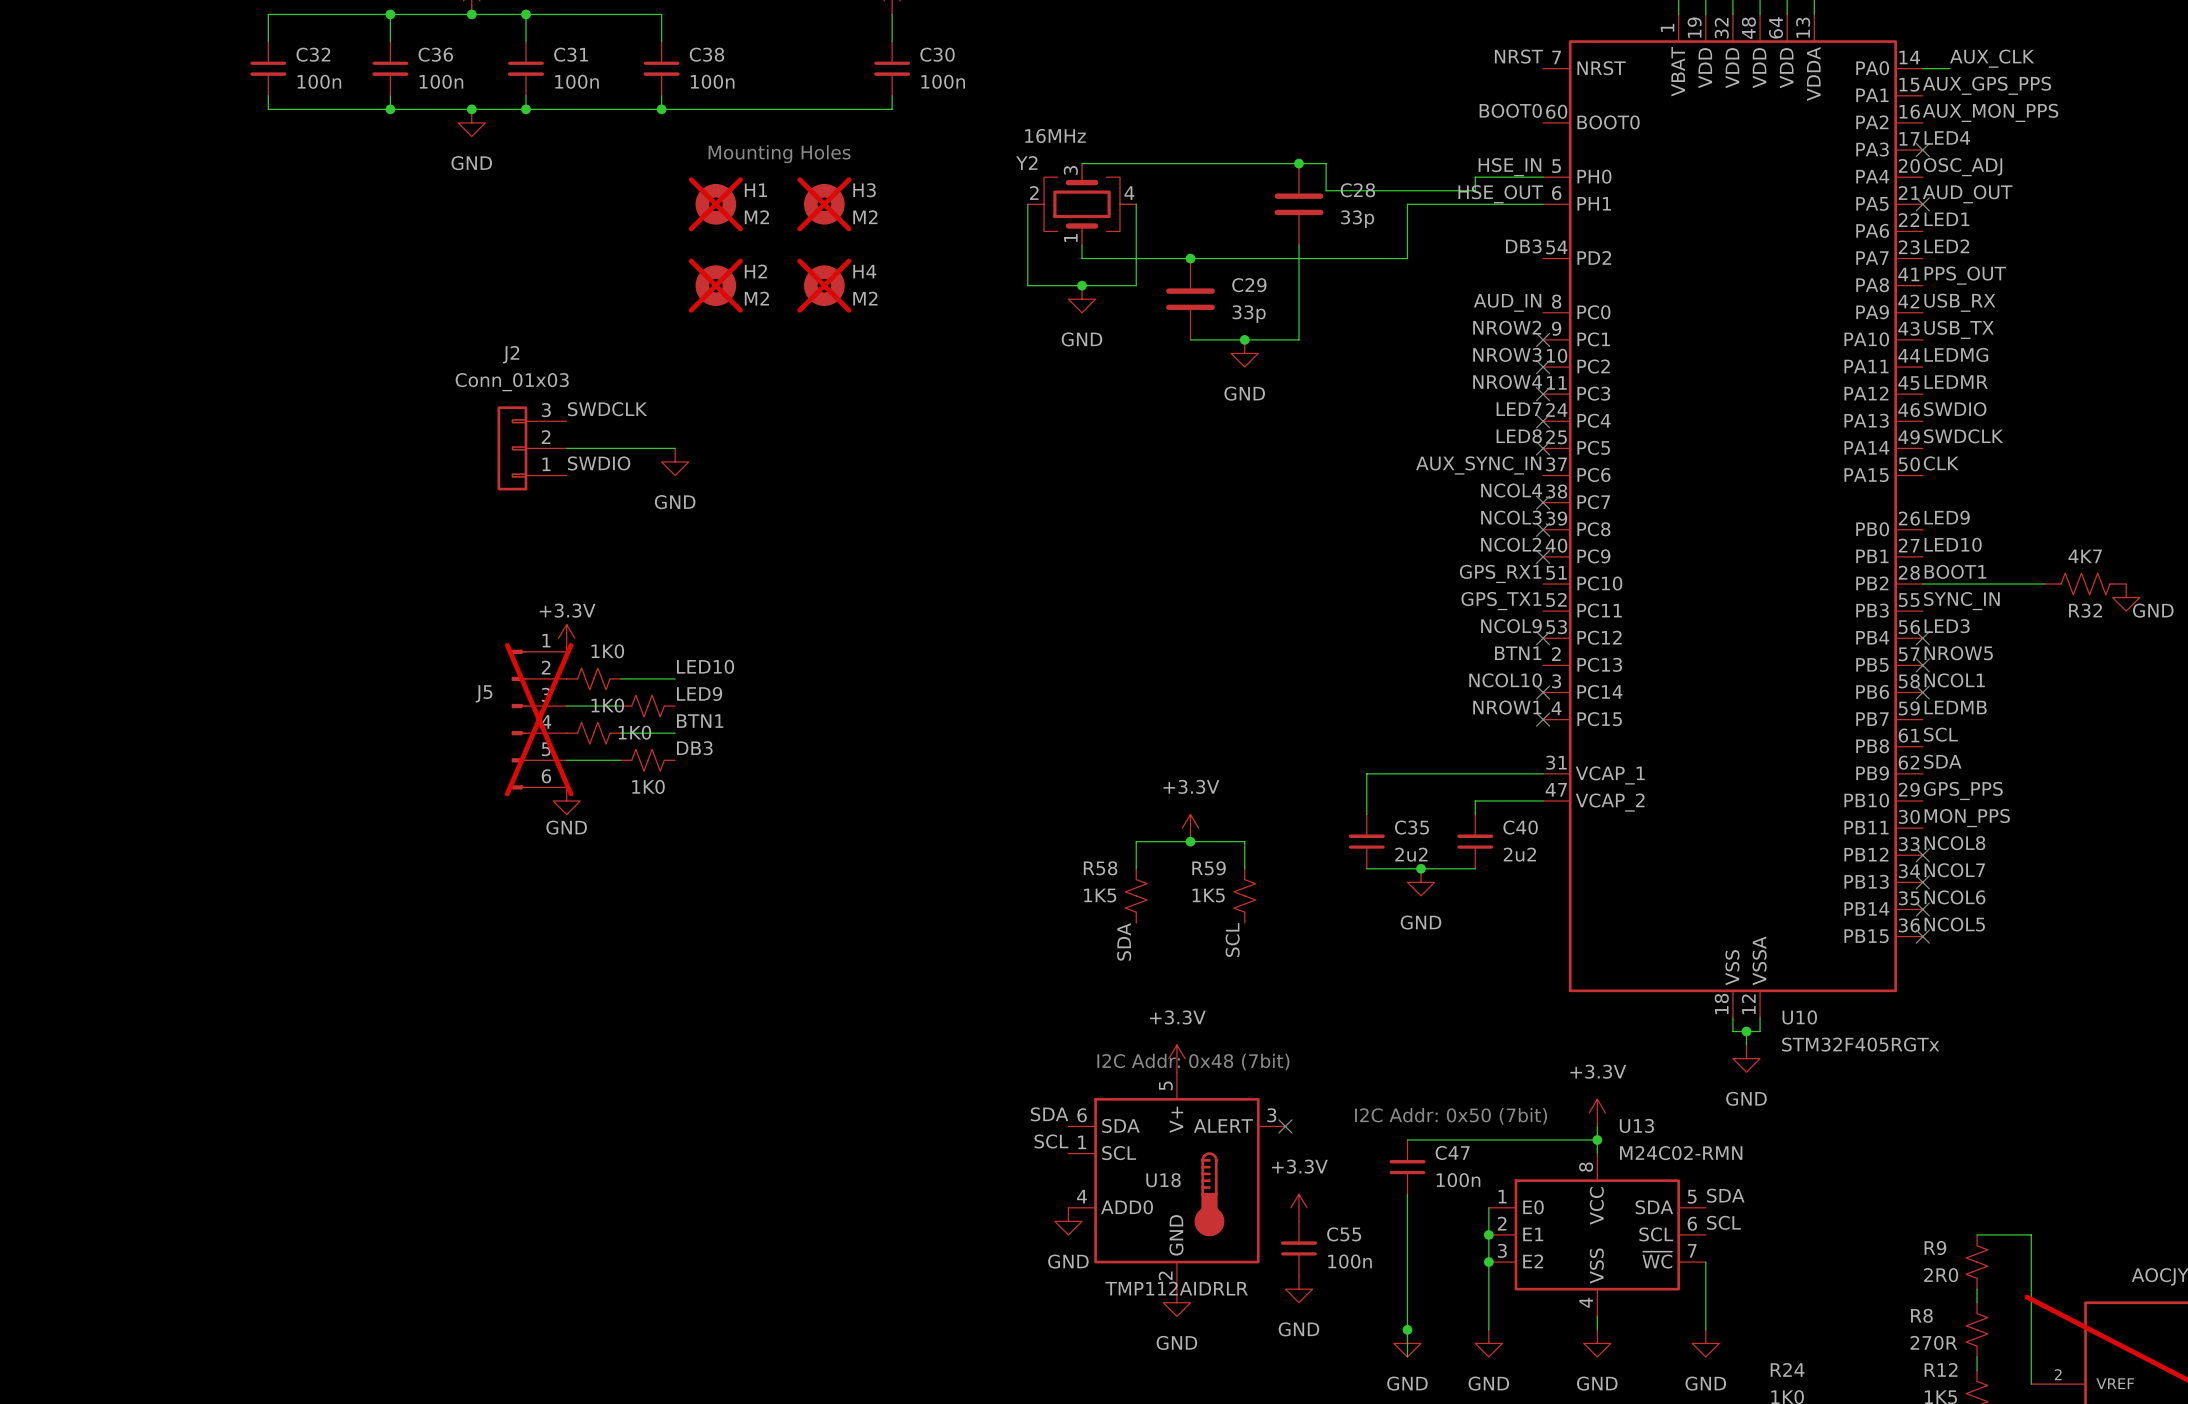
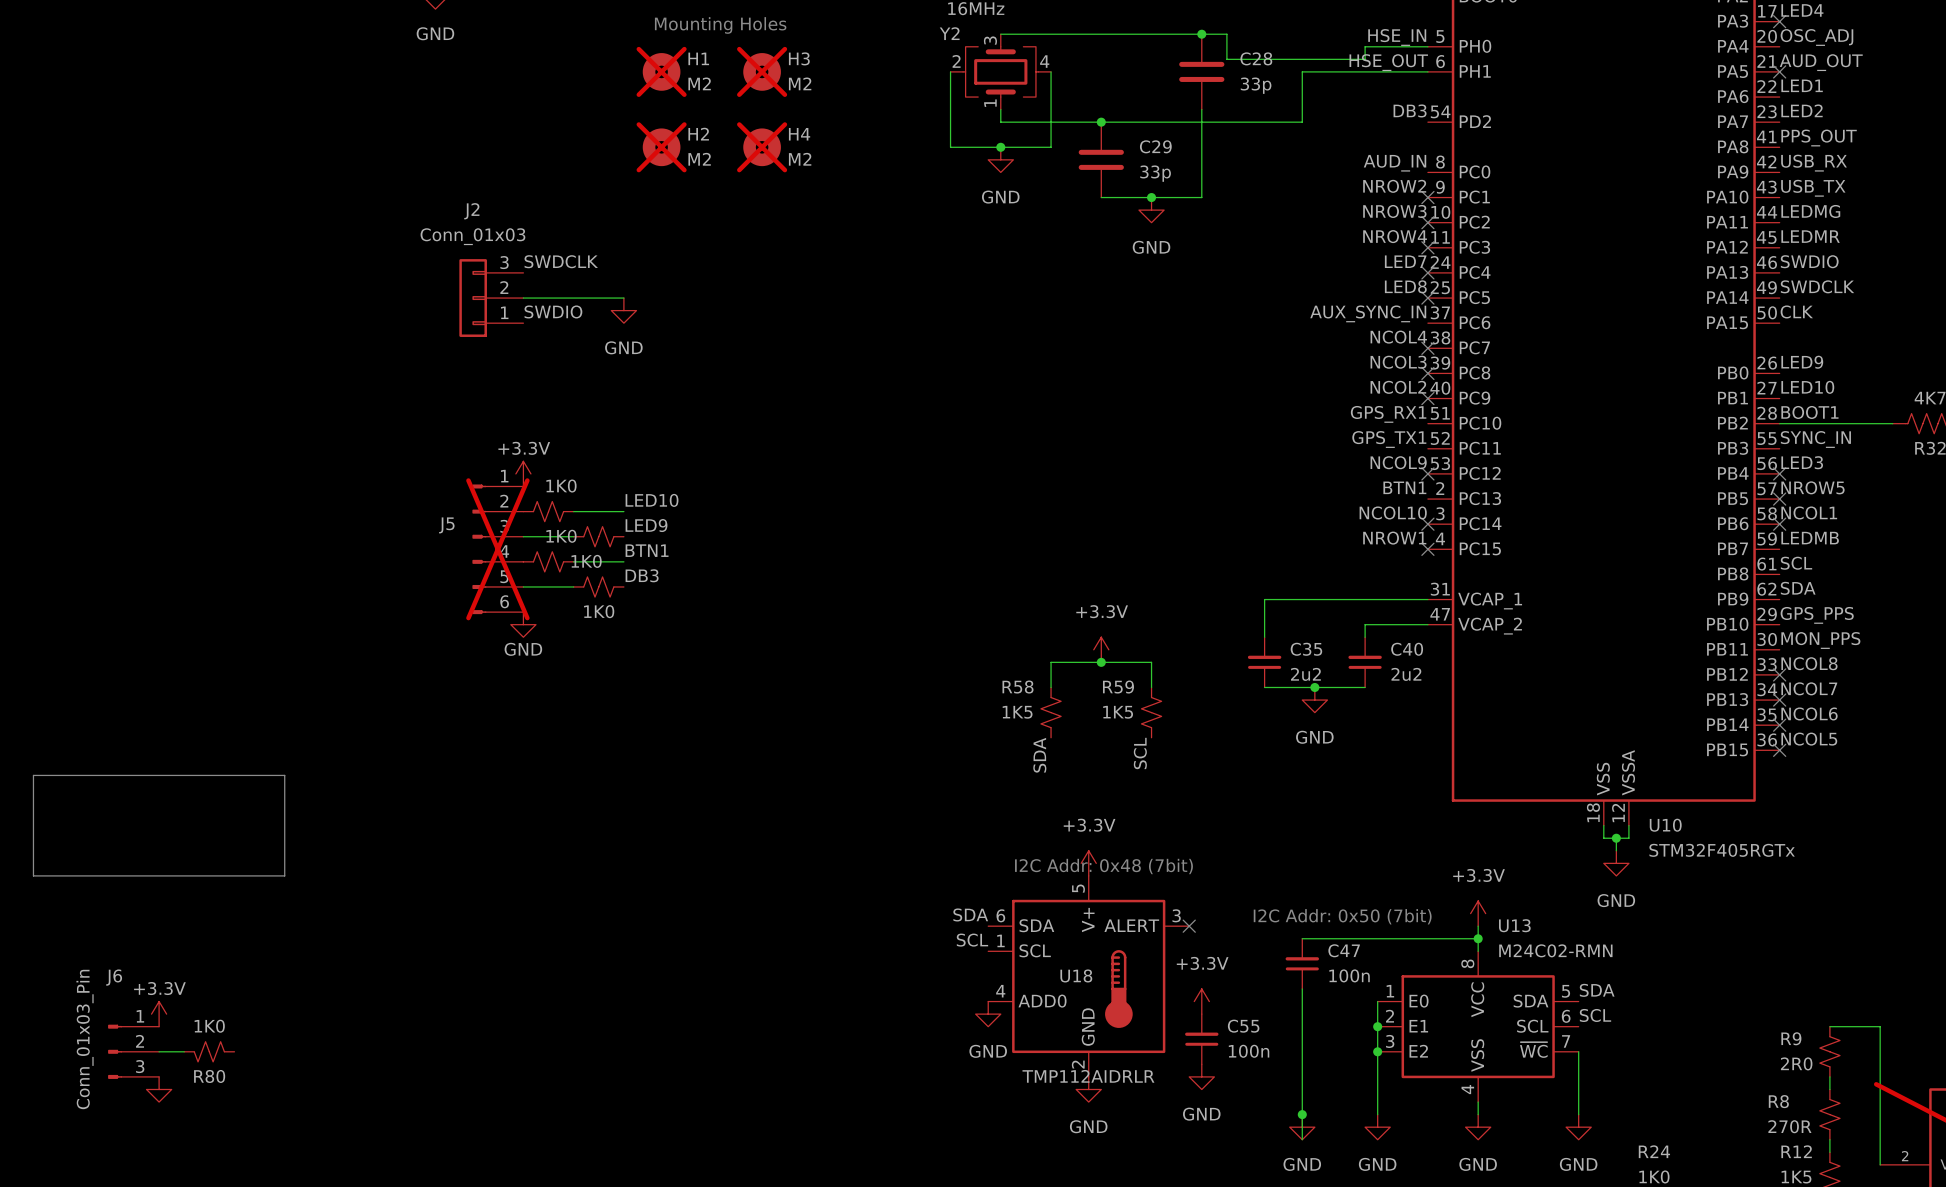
line: none -> (33, 775) (284, 775) (284, 875) (33, 875) (33, 775)
power symbol: none -> +3.3V (159, 1014)
J6: none -> Conn_01x03_Pin (133, 1051)
wire: none -> (159, 1051) (184, 1051)
R80: none -> 1K0 (209, 1051)
power symbol: none -> (159, 1089)

